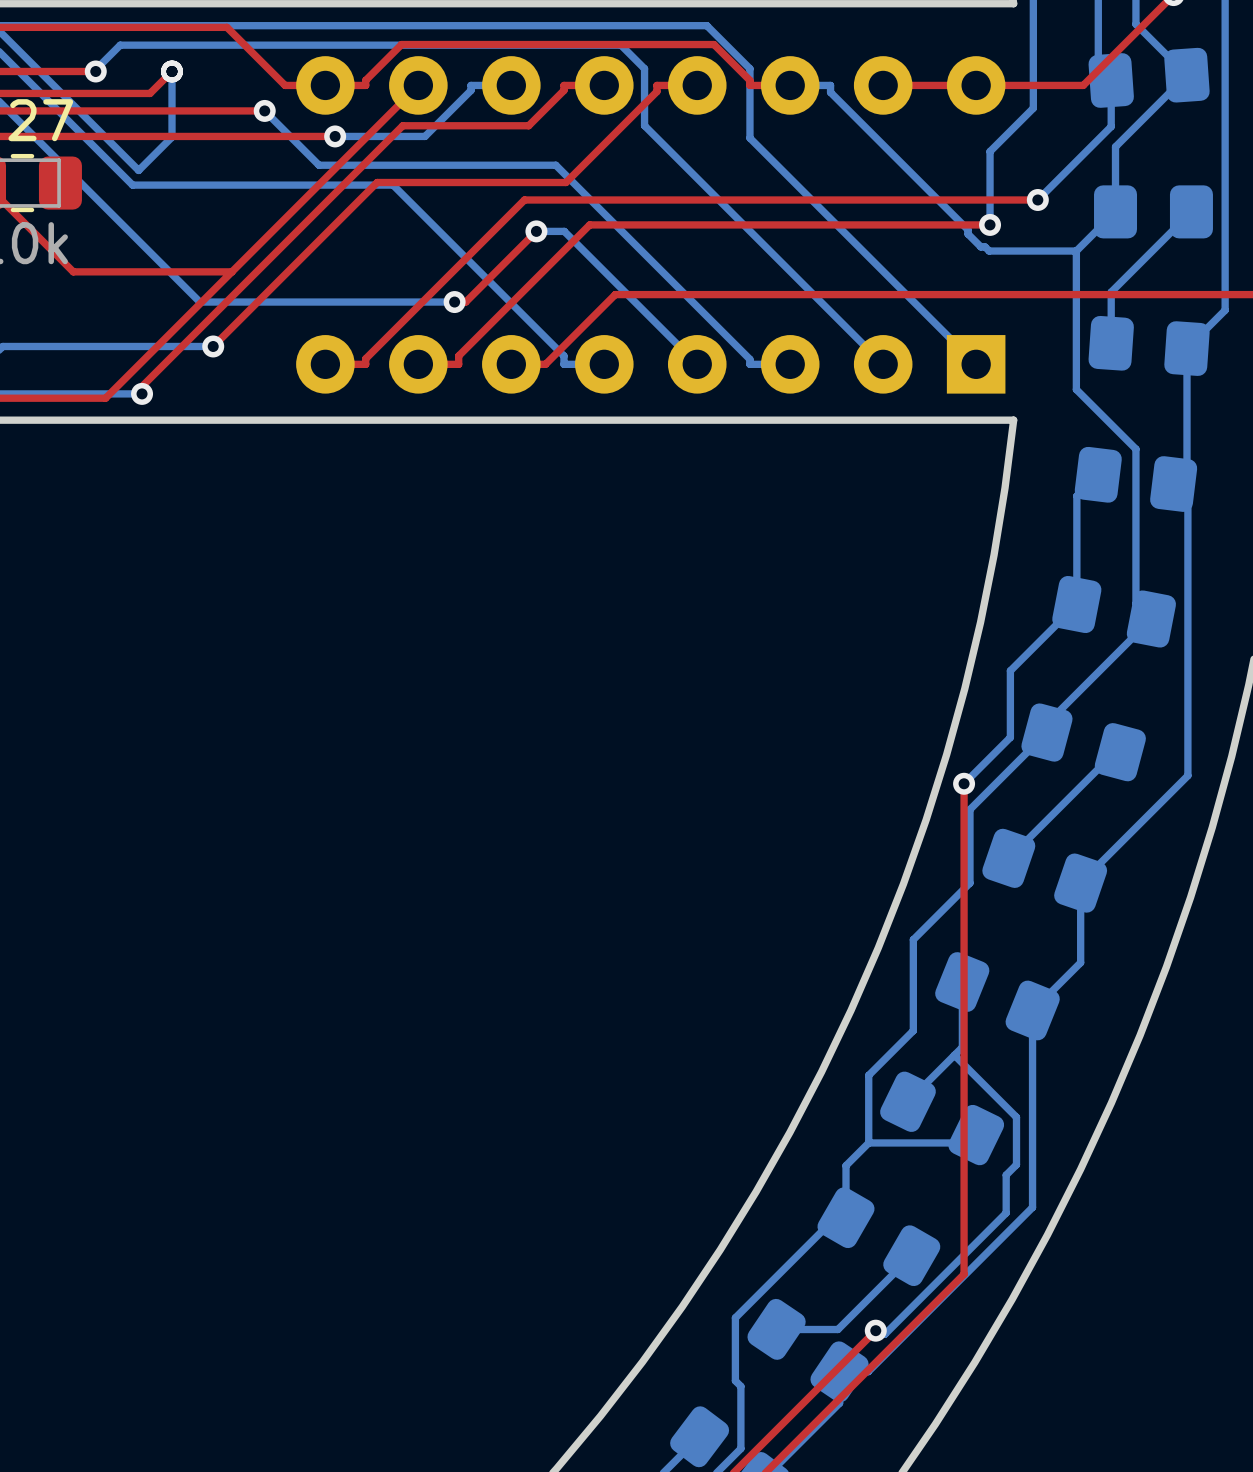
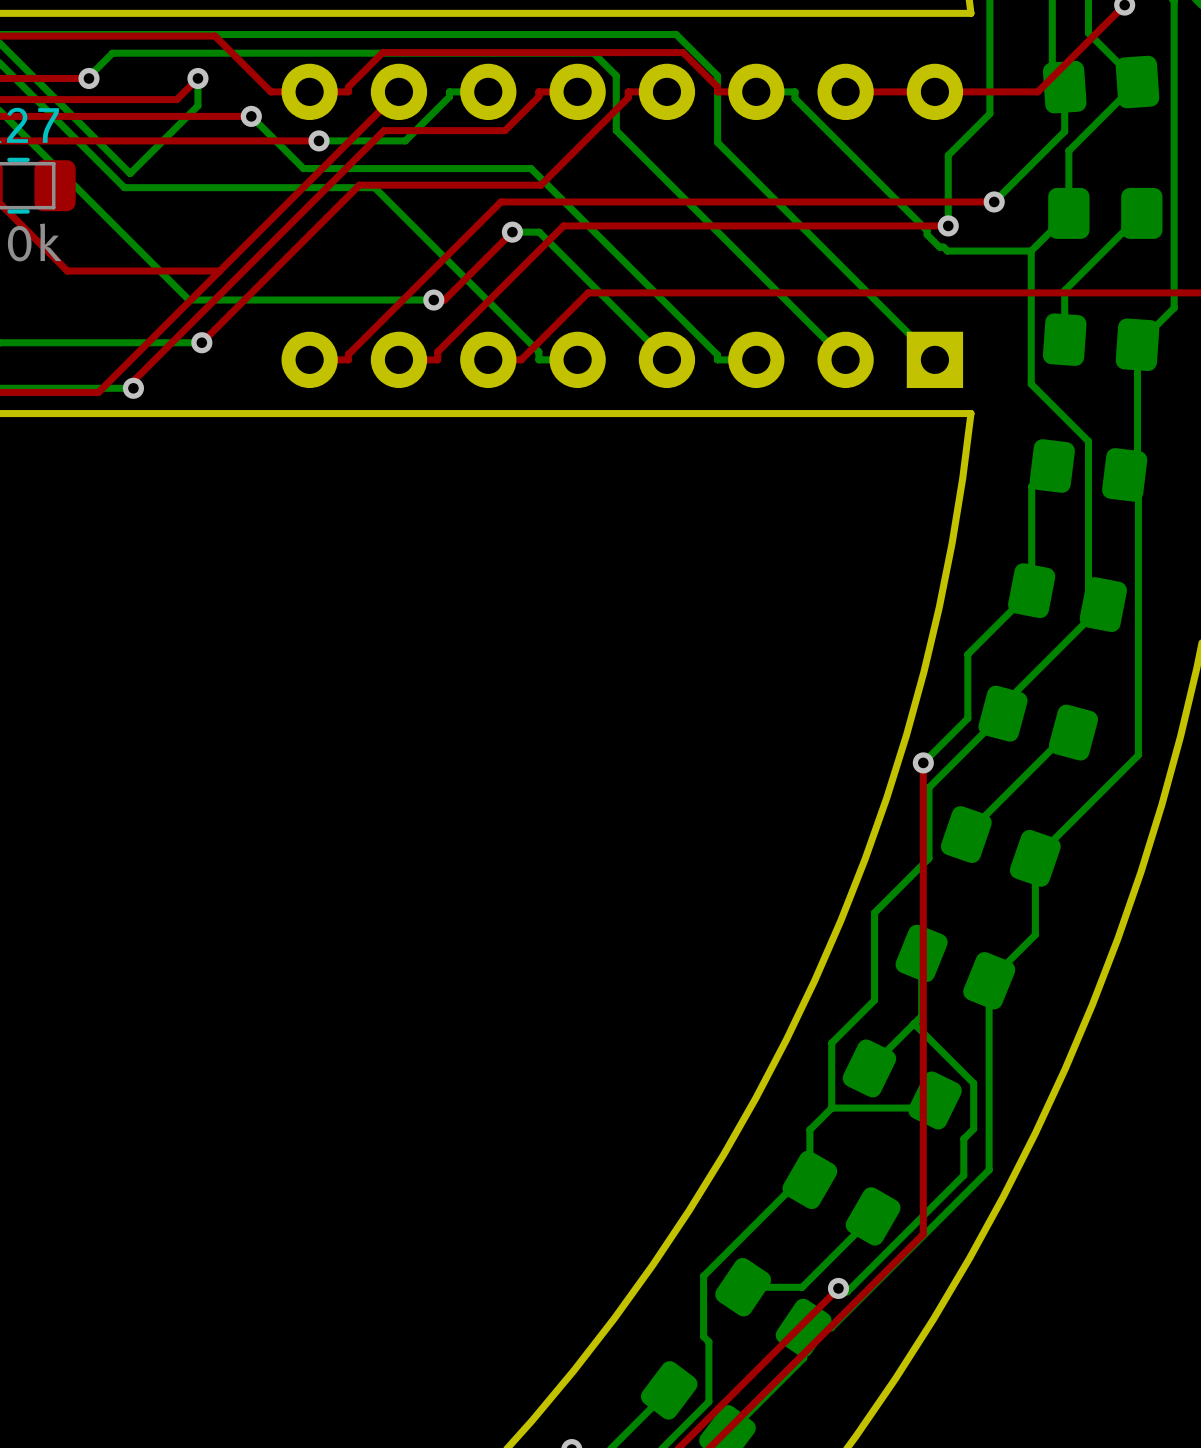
top track: (172, 71) (150, 93) -> (197, 78) (176, 99) (141, 99)
bottom track: (172, 71) (172, 137) -> (197, 78) (197, 105) (162, 141)
via position: (172, 71) -> (197, 78)

